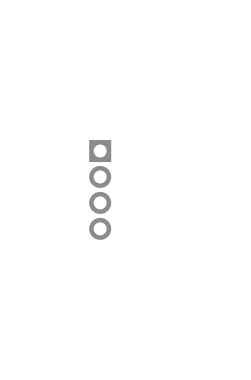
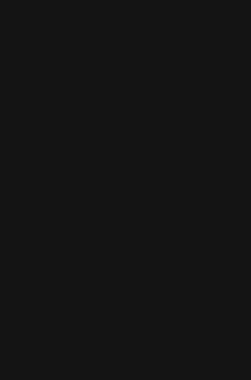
part: (100, 189) -> none

